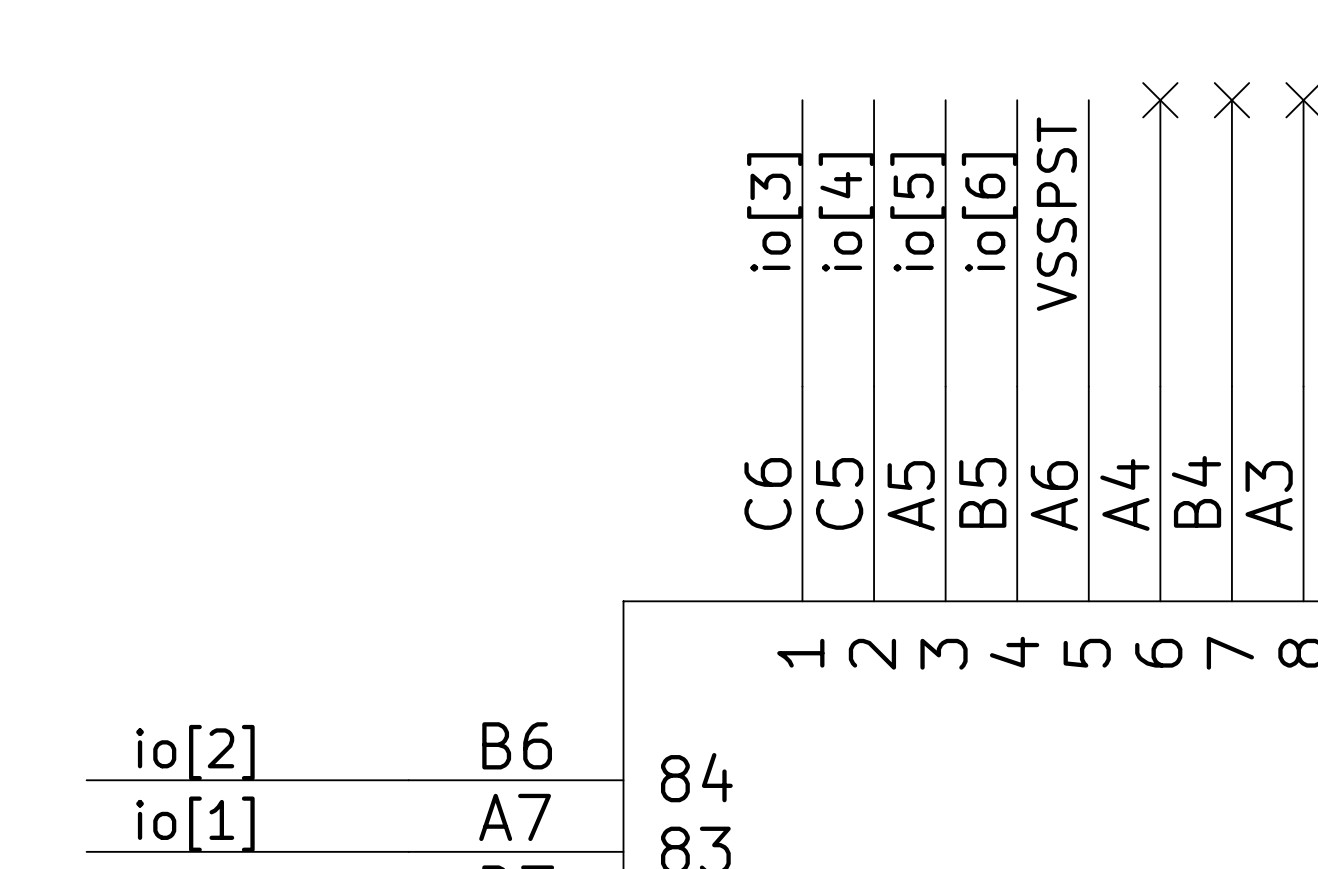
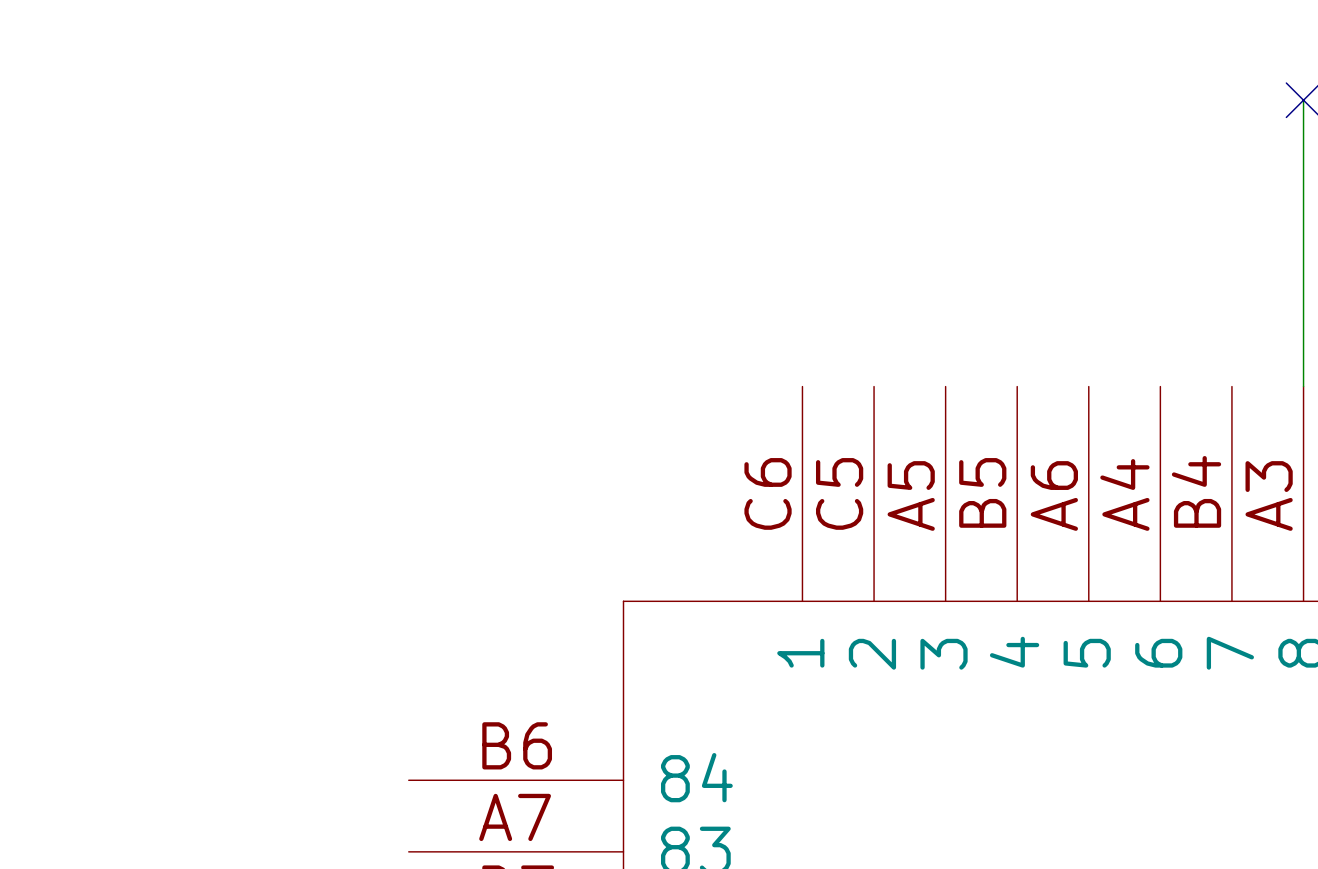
wire: (802, 100) (802, 386) -> none
wire: (874, 100) (874, 386) -> none
wire: (945, 100) (945, 386) -> none
wire: (1017, 100) (1017, 386) -> none
wire: (1088, 100) (1088, 386) -> none
wire: (1160, 100) (1160, 386) -> none
no-connect mark: (1160, 100) -> none
wire: (1231, 100) (1231, 386) -> none
no-connect mark: (1231, 100) -> none
label: io[3] (774, 212) -> none
label: io[4] (846, 212) -> none
label: io[5] (917, 212) -> none
label: io[6] (989, 212) -> none
label: VSSPST (1056, 214) -> none
label: io[2] (195, 752) -> none
wire: (86, 780) (408, 780) -> none
label: io[1] (195, 824) -> none
wire: (86, 851) (408, 851) -> none

